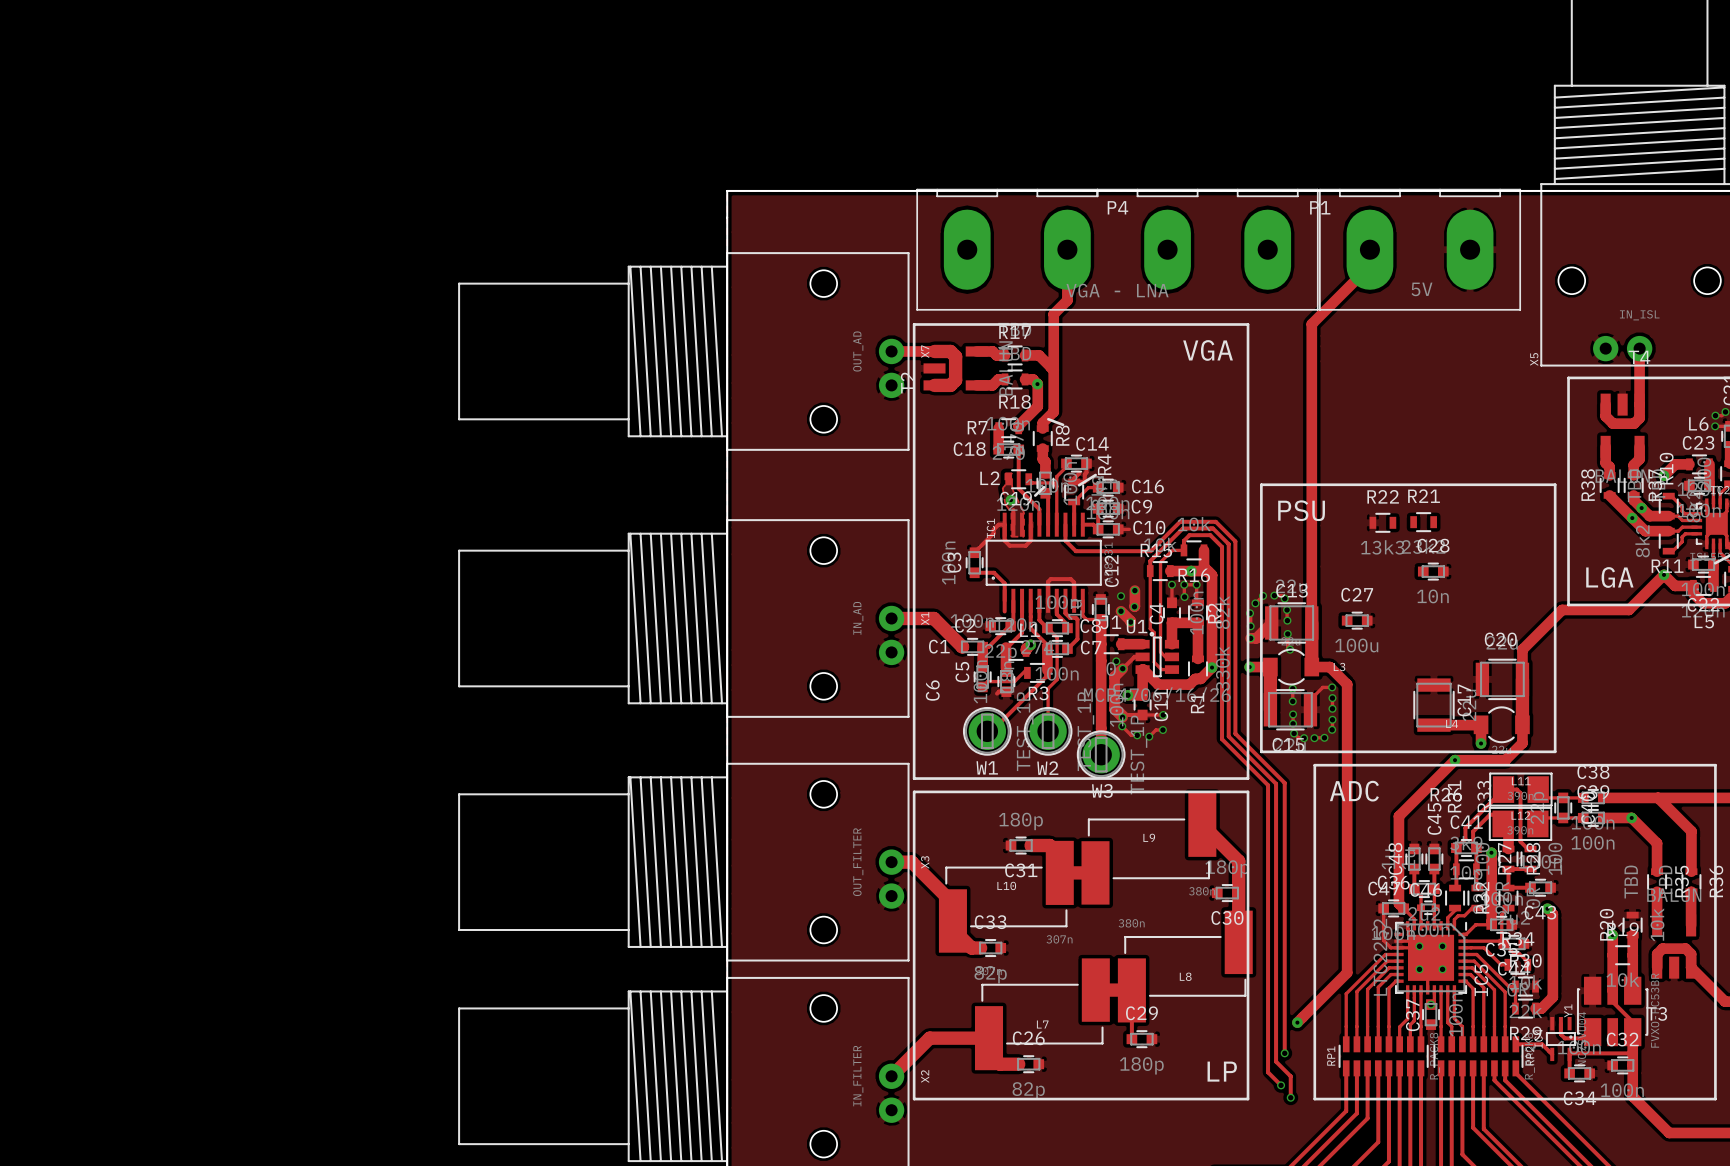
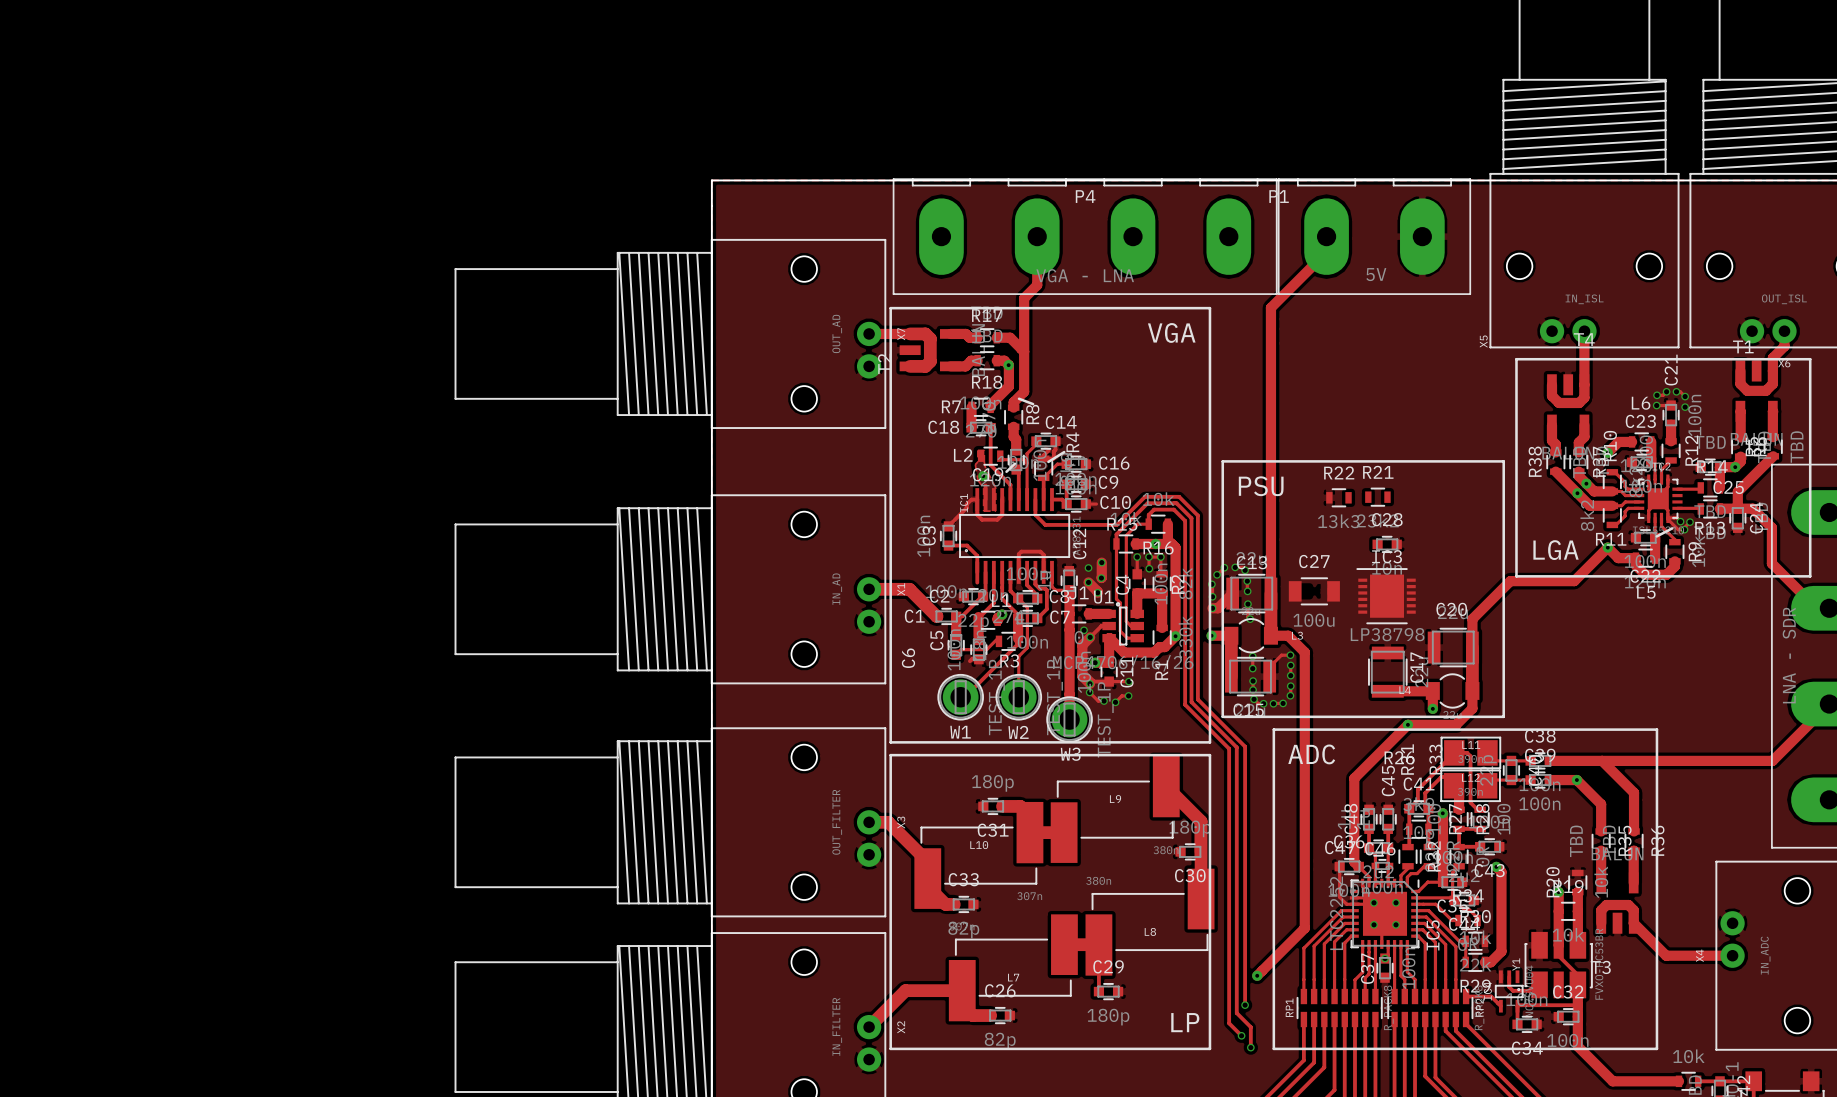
C27 footprint: [1341, 611, 1373, 630] -> [1288, 577, 1340, 606]
IC3: none -> LP38798 (1386, 596)

